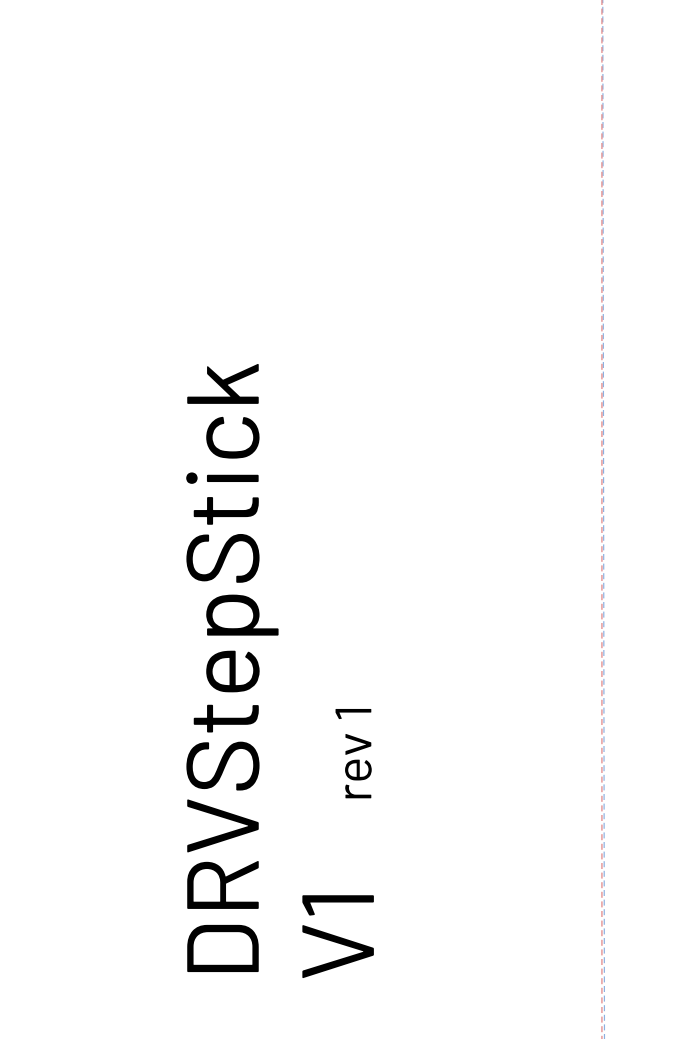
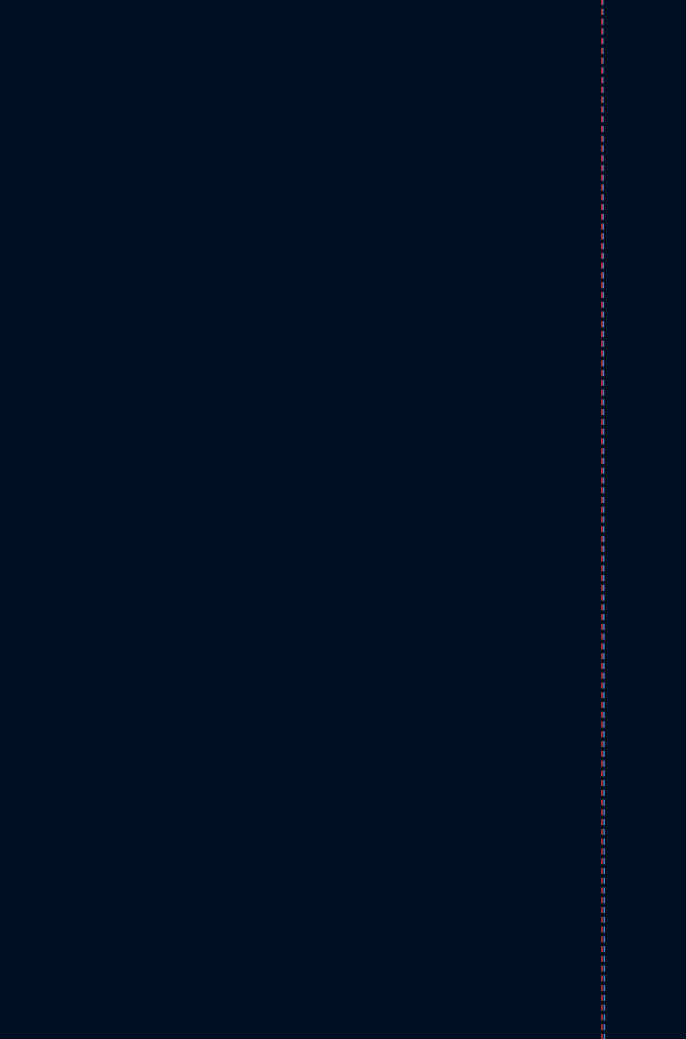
text: DRVStepStick (232, 668) -> none
text: rev 1 (353, 753) -> none
text: V1 (338, 936) -> none

